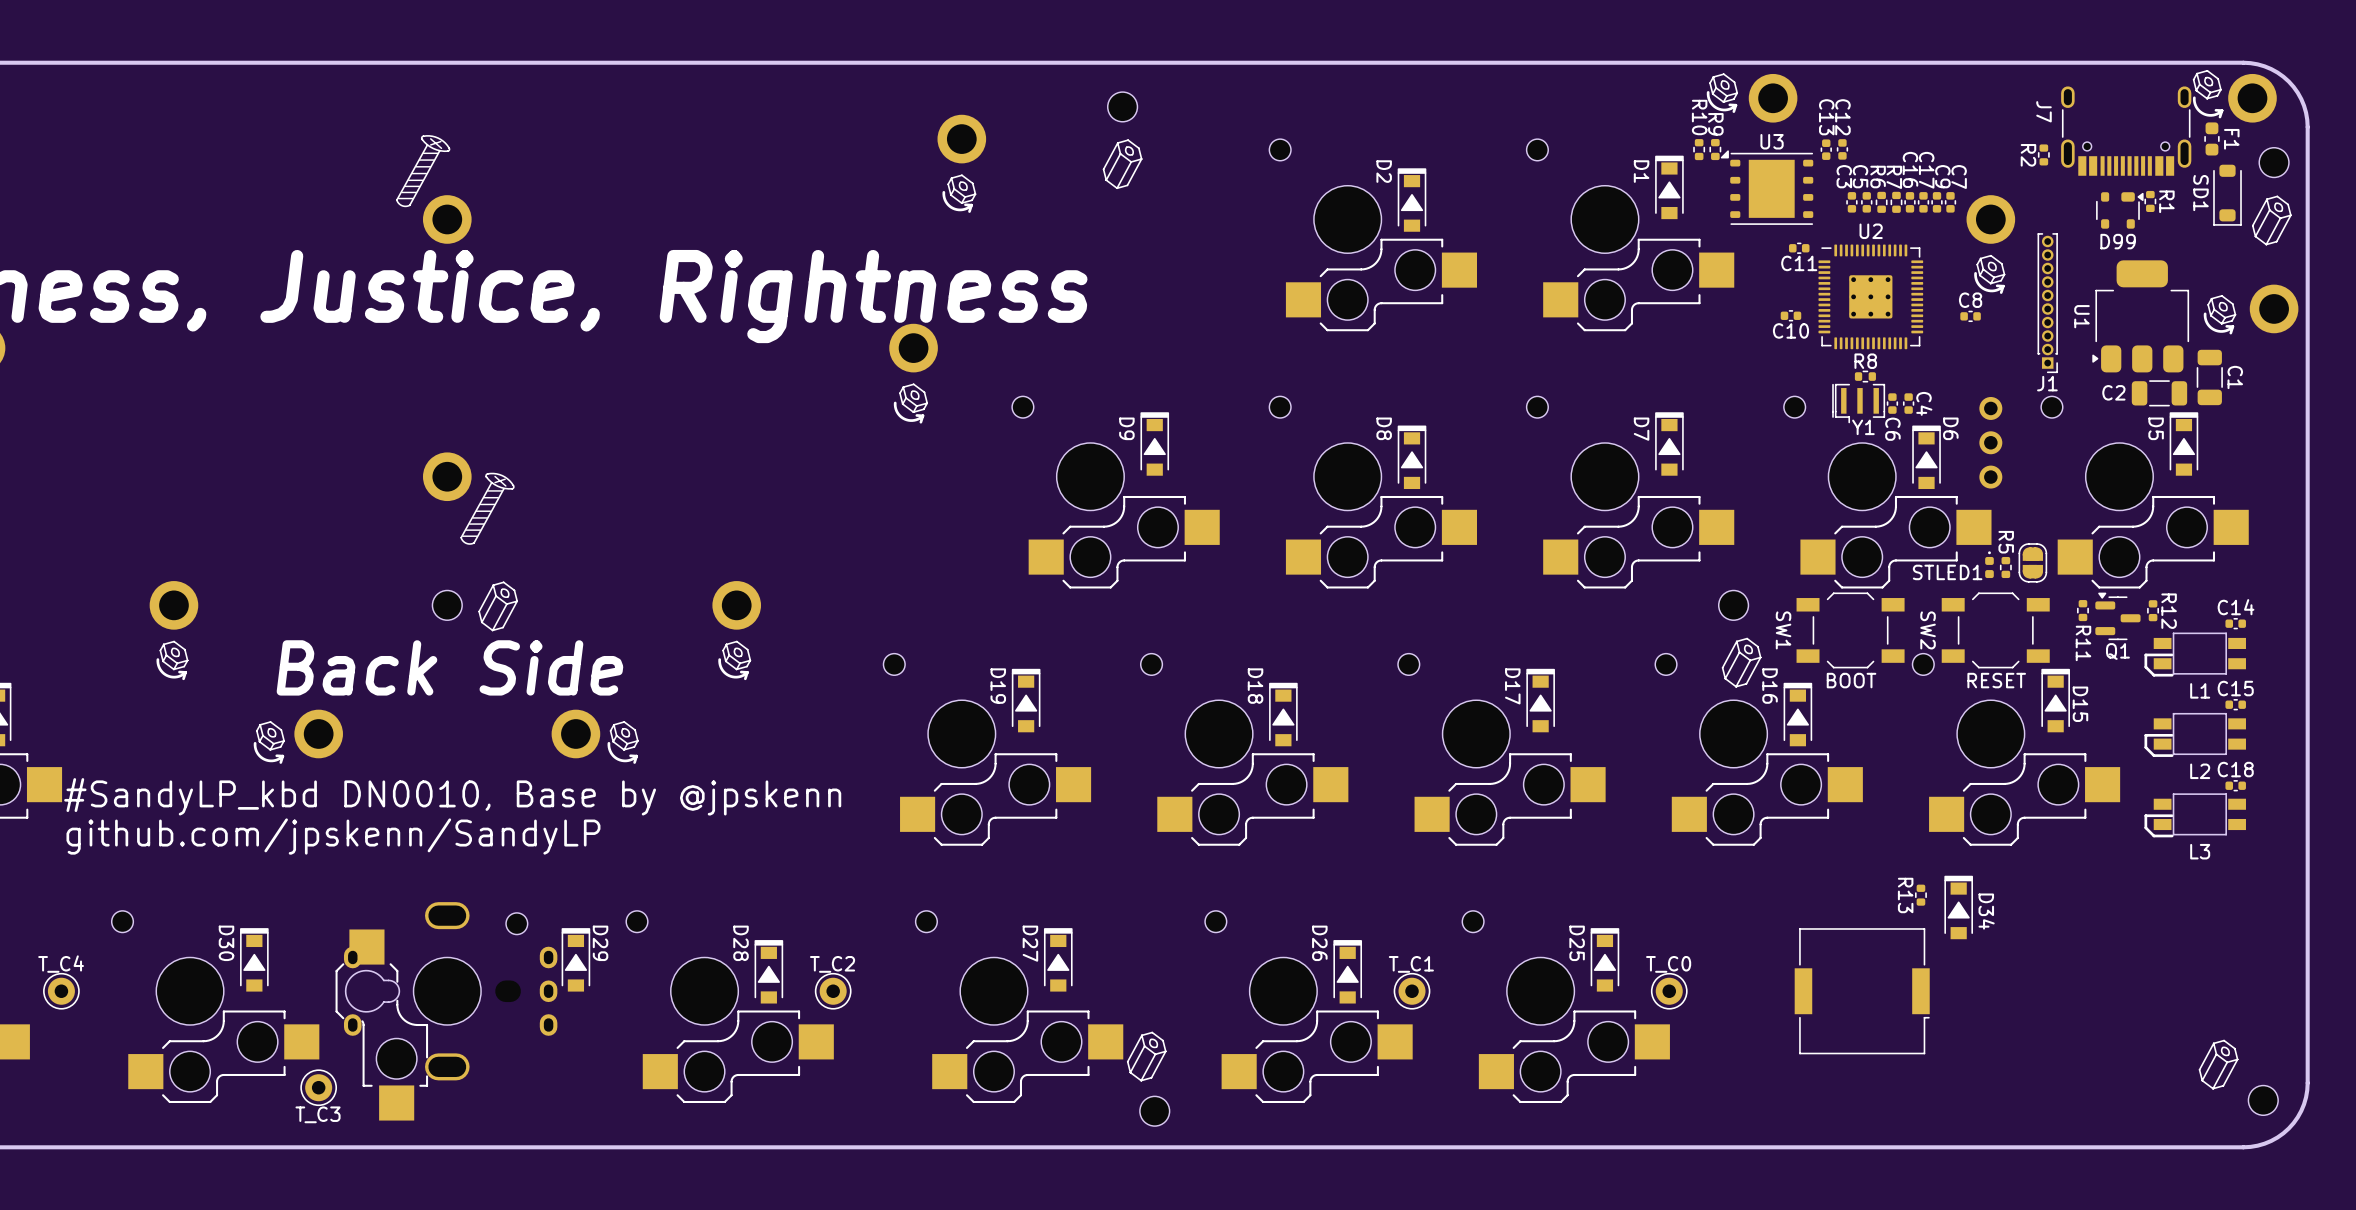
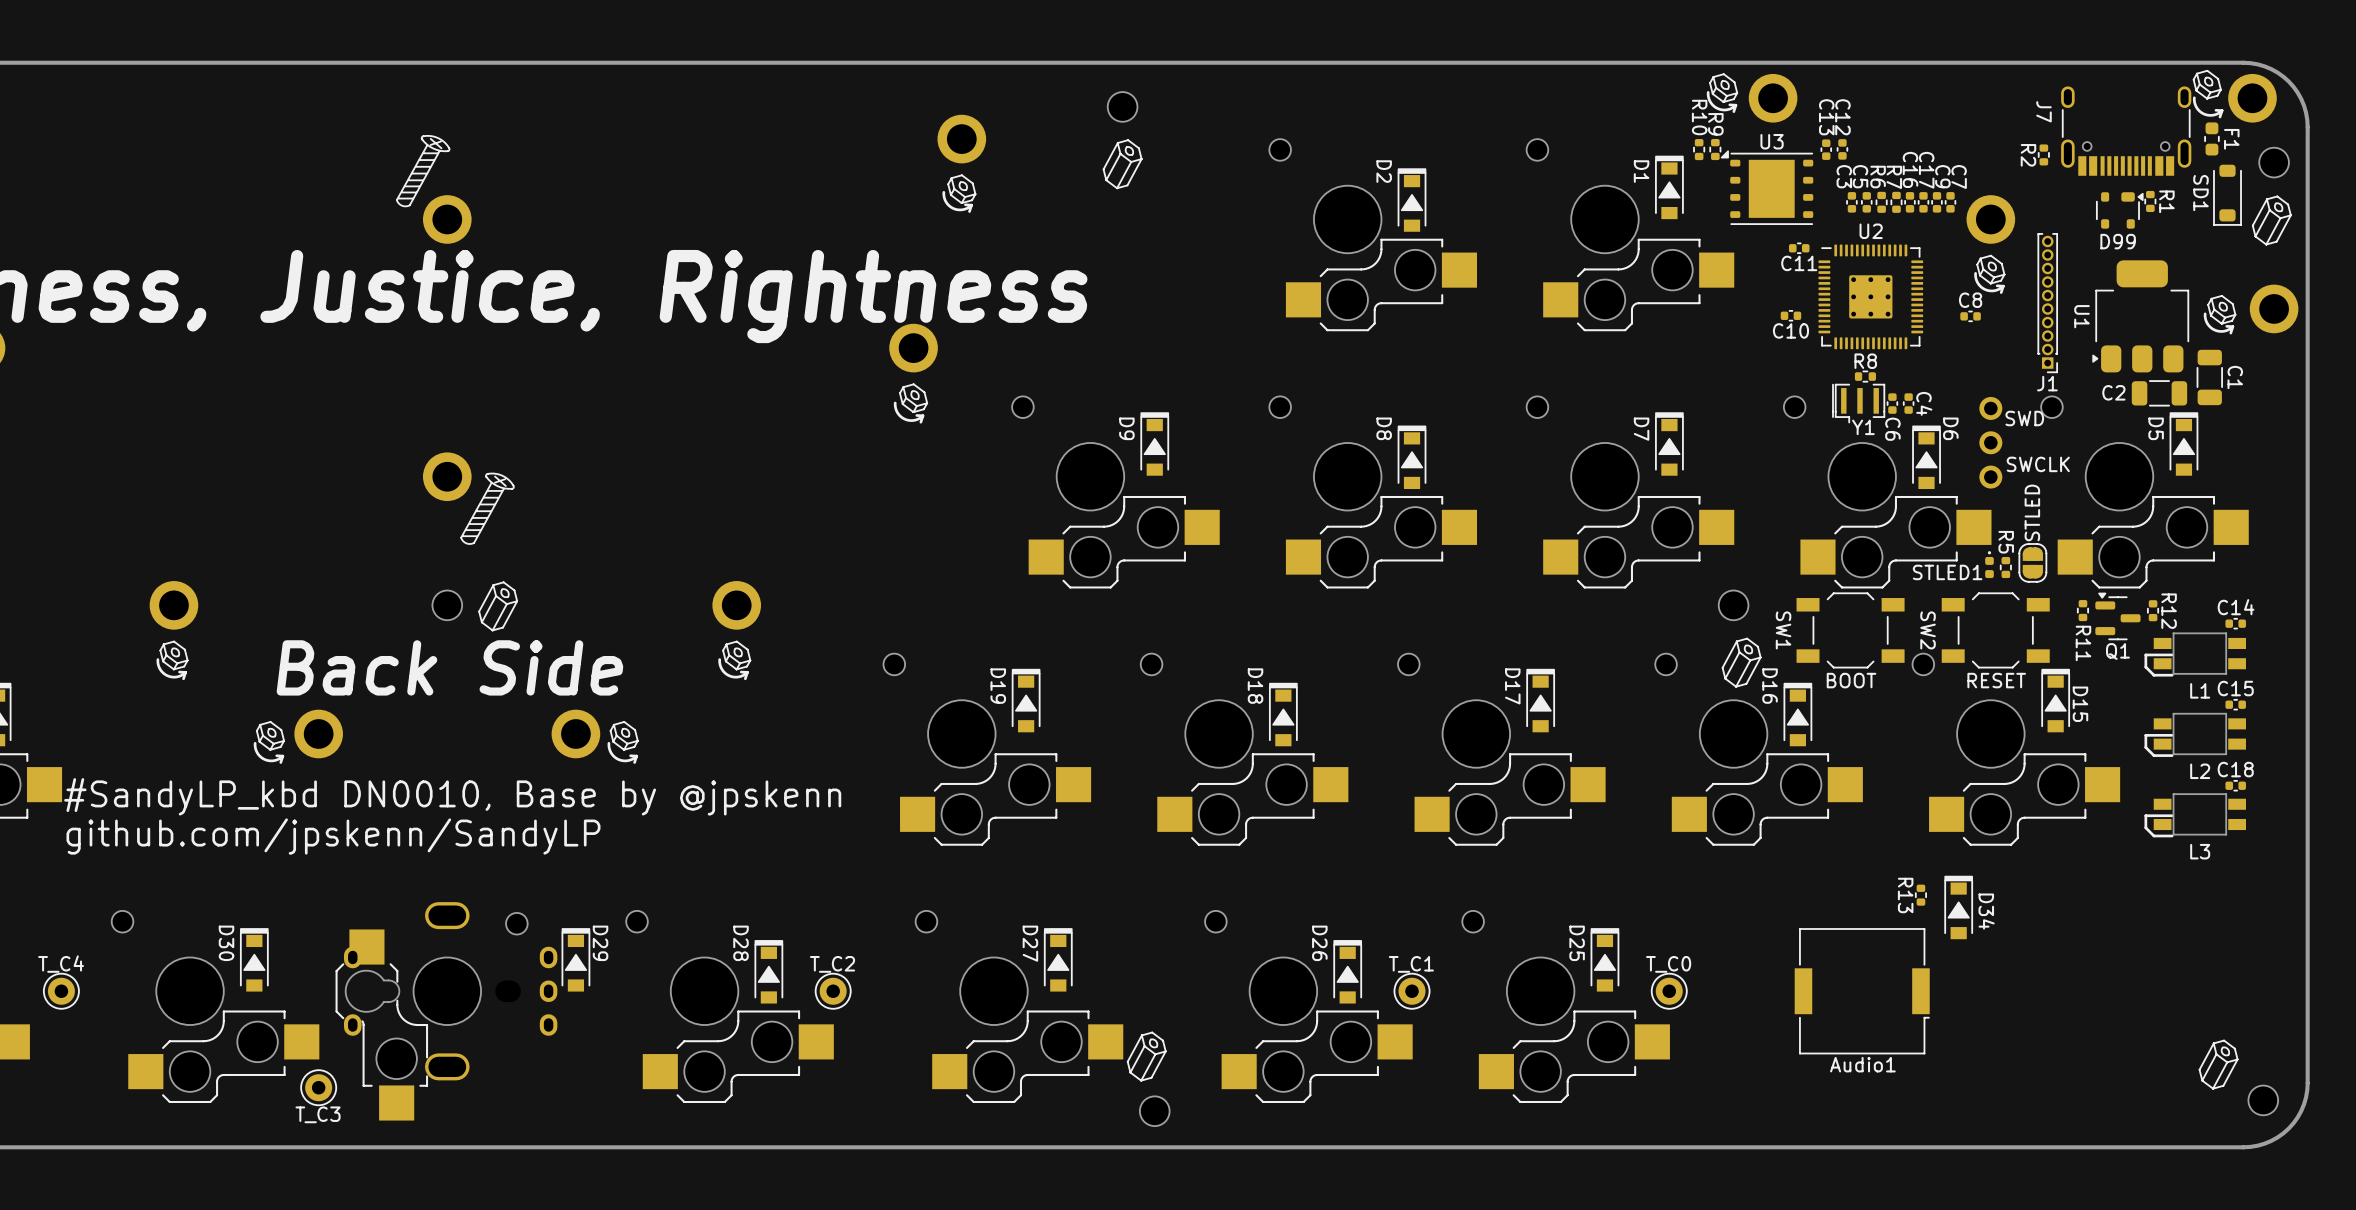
part text: none -> SWD (2024, 418)
part text: none -> SWCLK (2038, 464)
part text: none -> STLED (2032, 512)
part text: none -> Audio1 (1862, 1064)

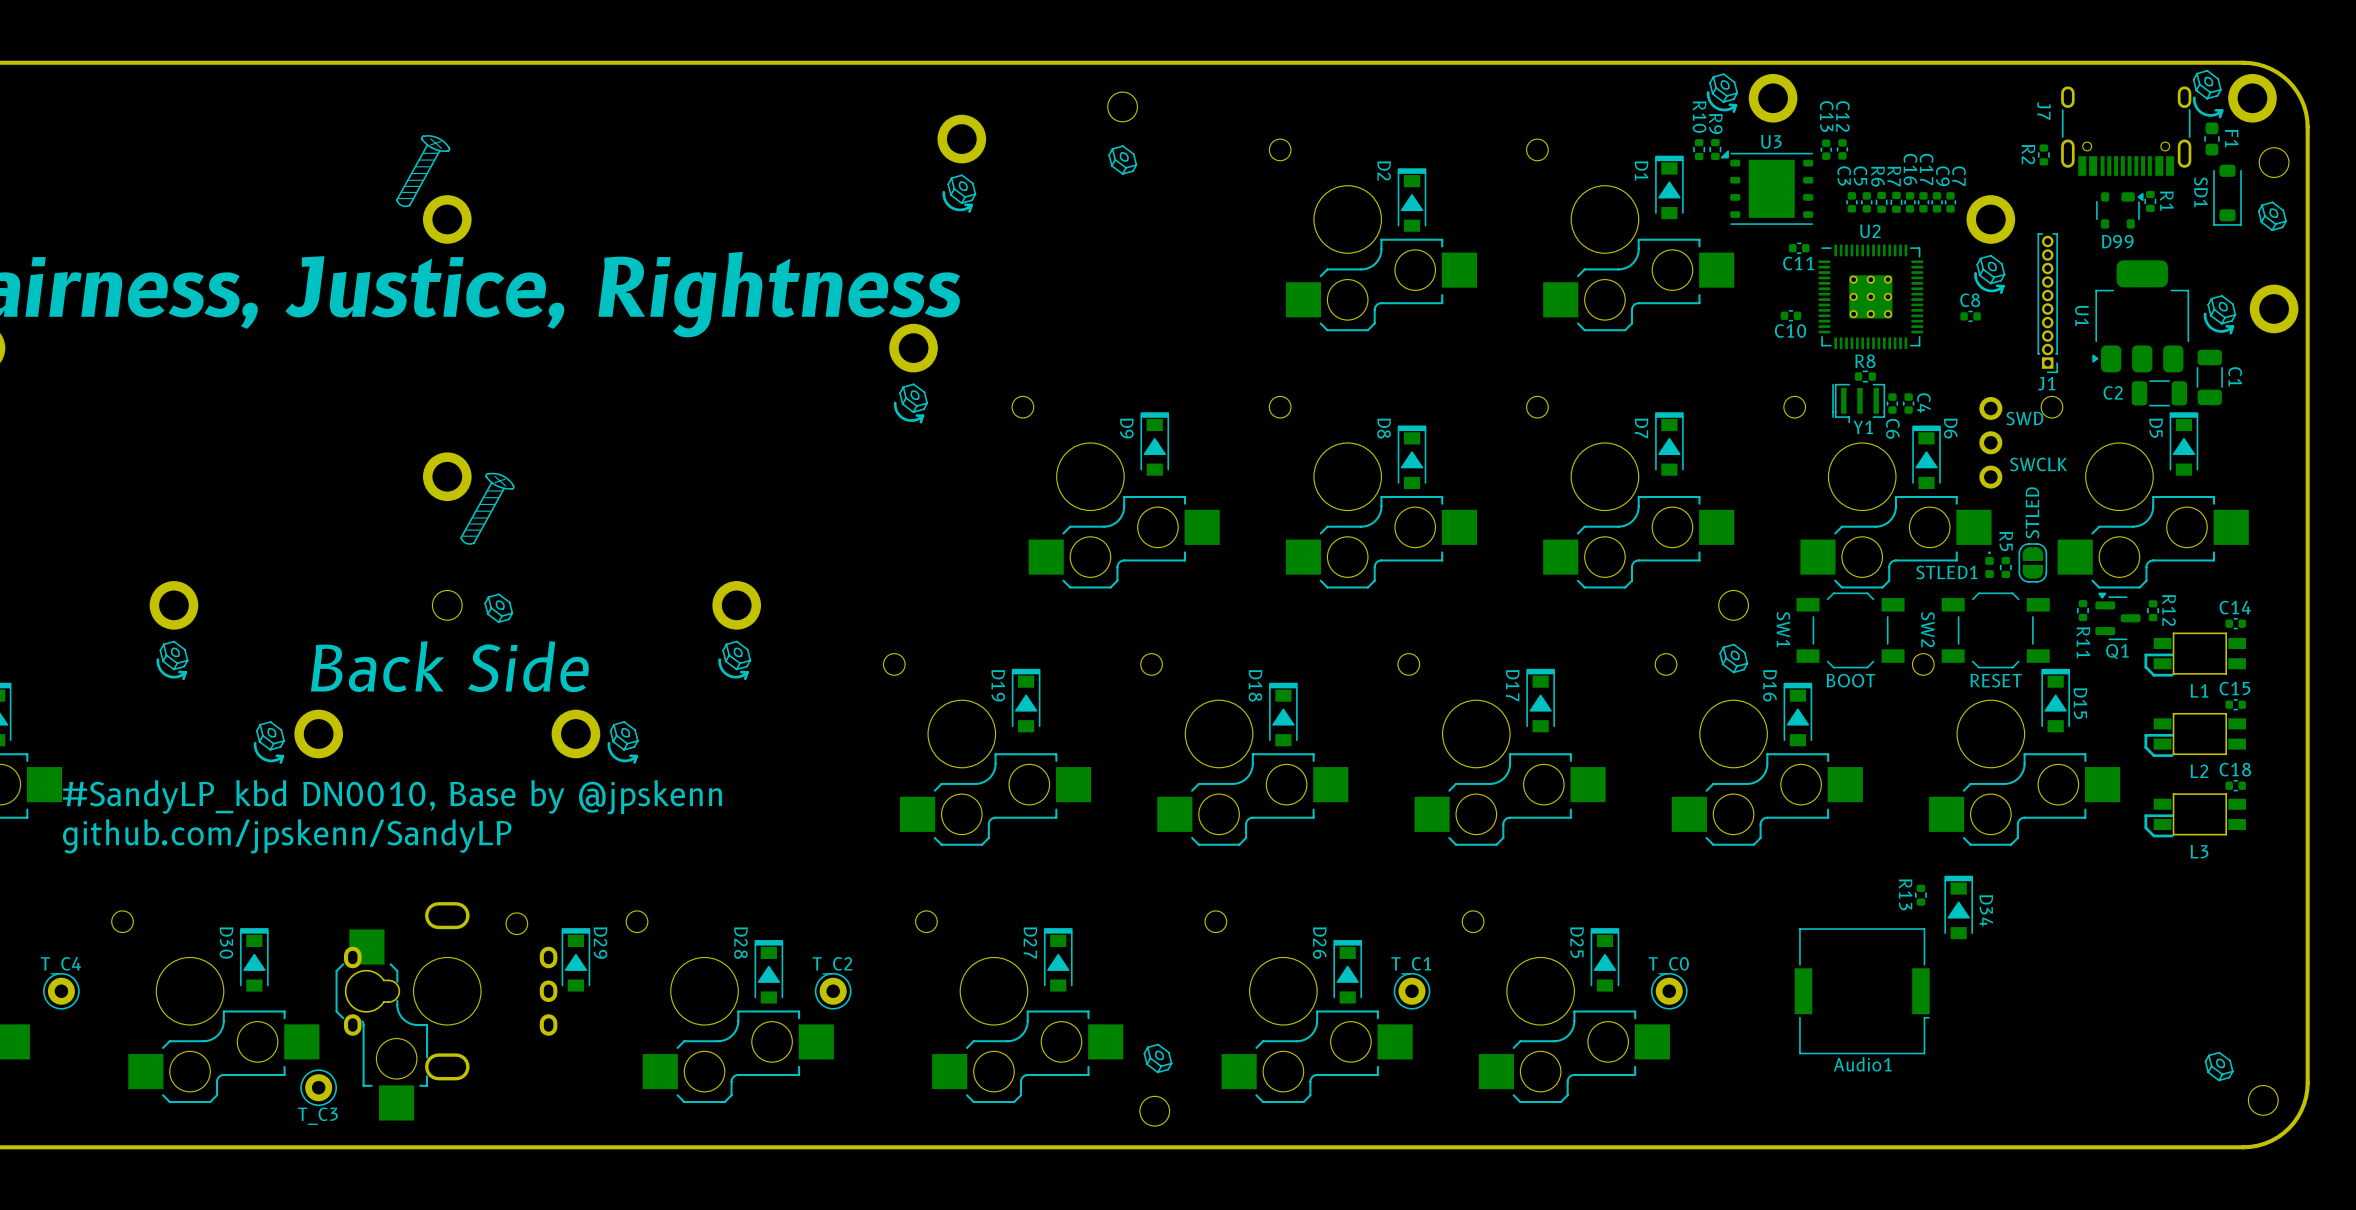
drawing shape: [1102, 139, 1143, 190] -> [1108, 145, 1138, 175]
drawing shape: [2251, 195, 2292, 246] -> [2257, 201, 2287, 232]
drawing shape: [478, 581, 518, 632] -> [484, 593, 514, 624]
drawing shape: [1721, 637, 1762, 688] -> [1719, 643, 1749, 674]
drawing shape: [1126, 1031, 1167, 1082] -> [1143, 1043, 1173, 1074]
drawing shape: [2198, 1039, 2239, 1090] -> [2204, 1051, 2234, 1082]

